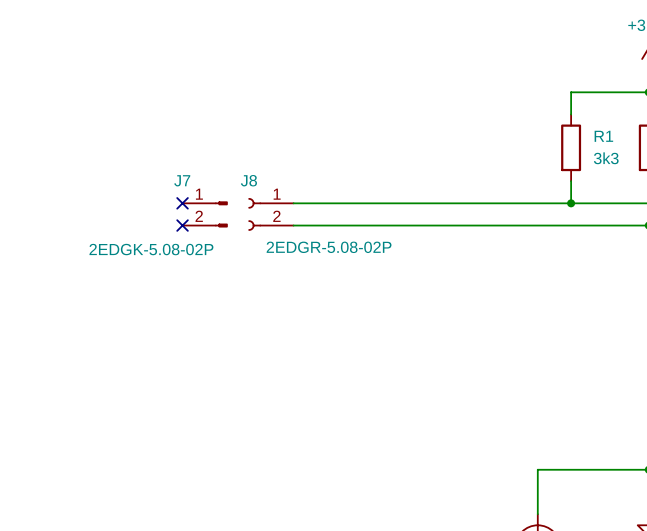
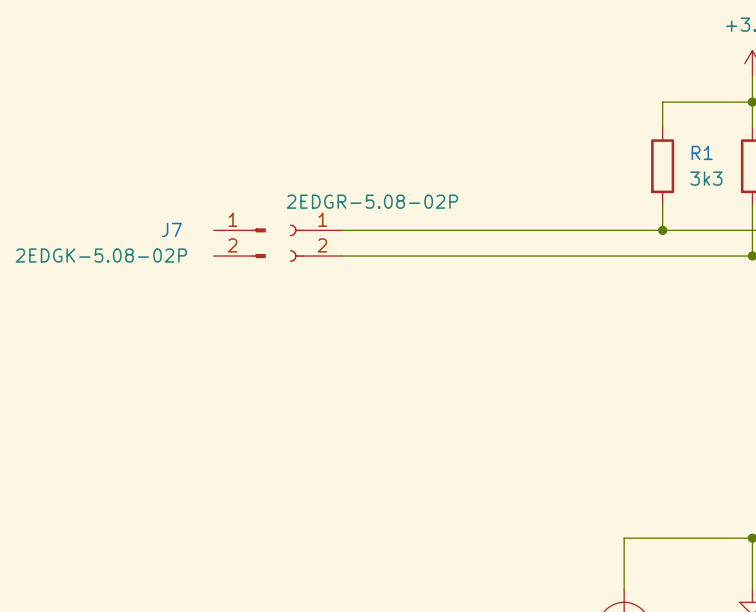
J7 name position: J7 (182, 180) -> J7 (171, 229)
J8 name: J8 (248, 180) -> none
no-connect mark: (182, 203) -> none
no-connect mark: (182, 225) -> none
J8 value position: 2EDGR-5.08-02P (329, 247) -> 2EDGR-5.08-02P (372, 201)
J7 value position: 2EDGK-5.08-02P (151, 249) -> 2EDGK-5.08-02P (101, 255)

